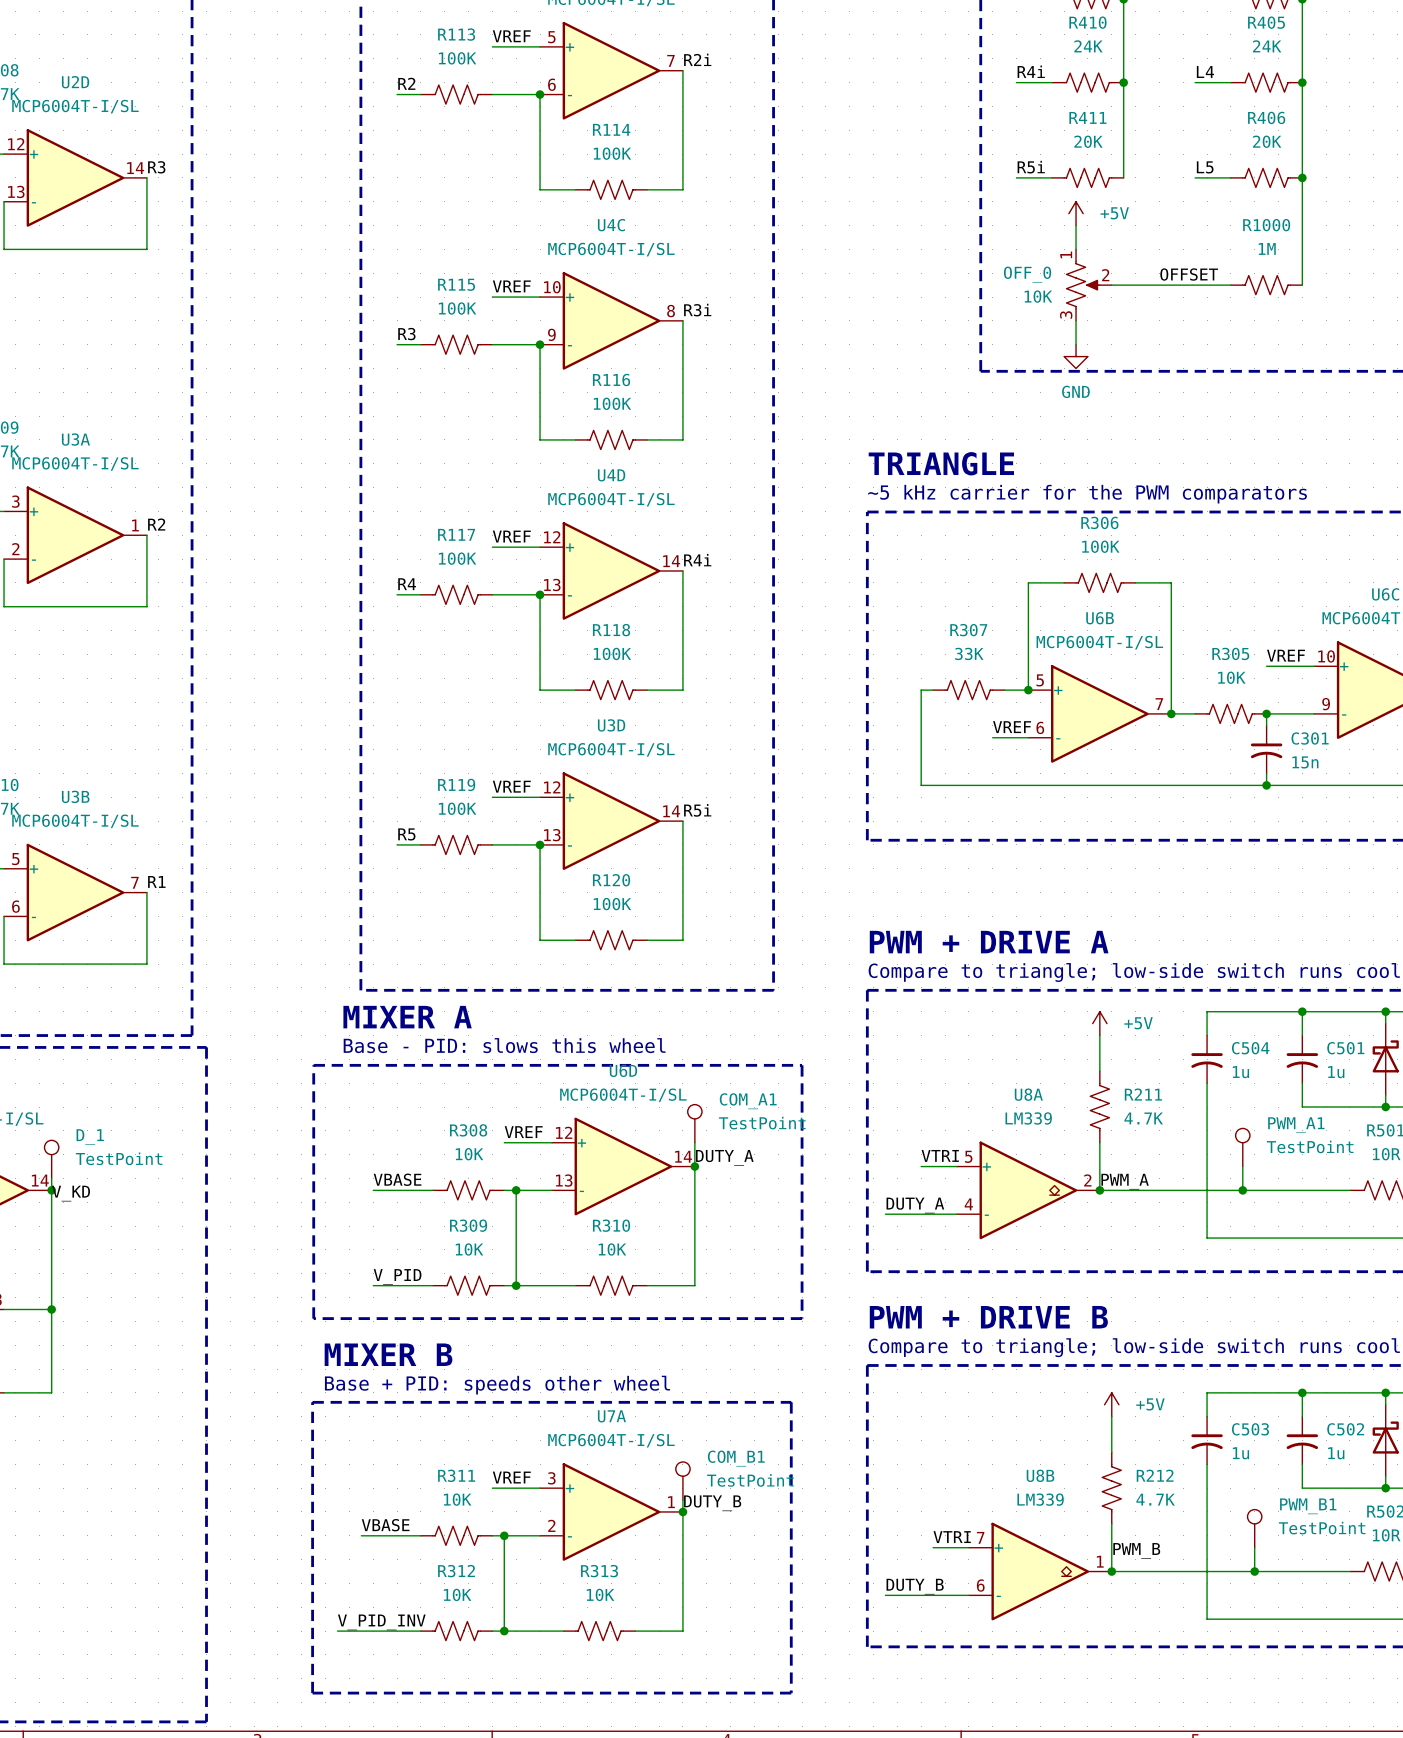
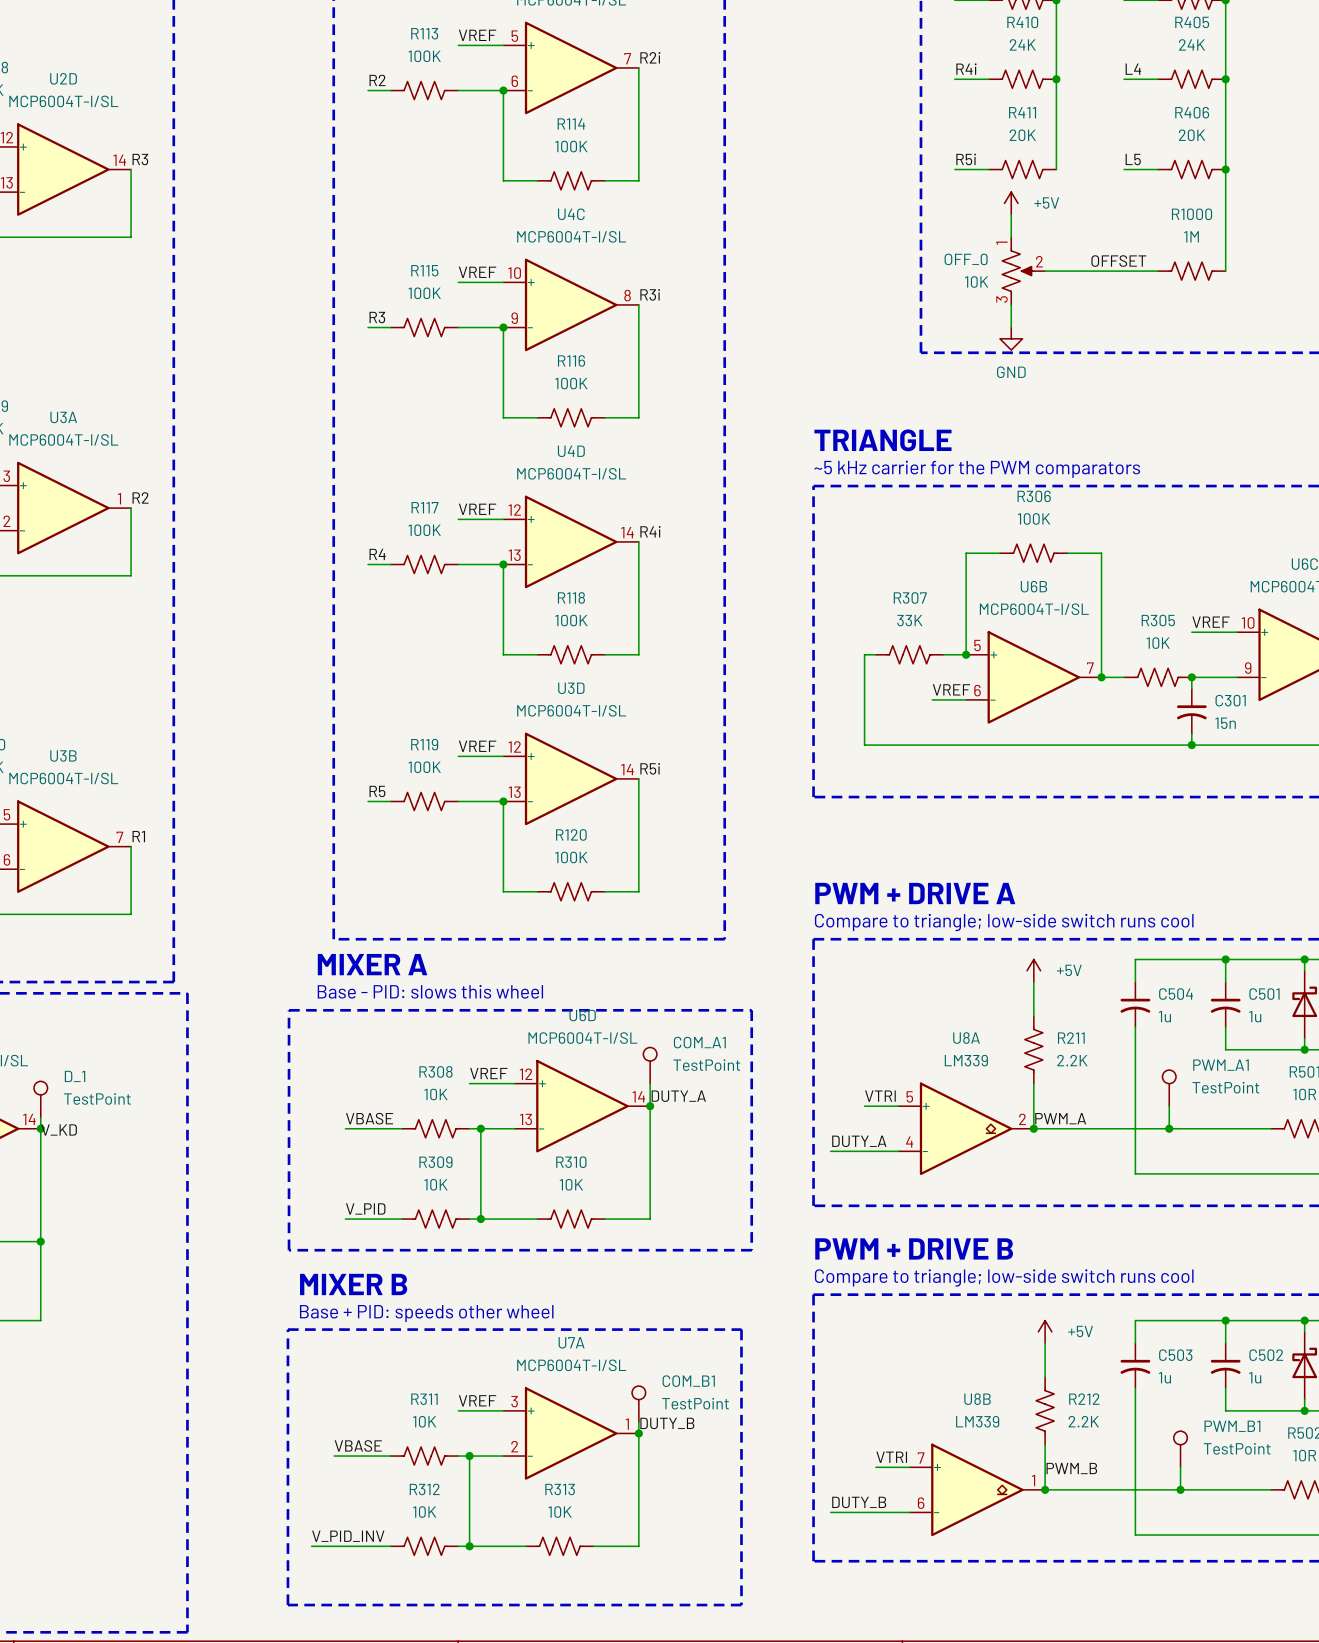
R211 value: 4.7K (1143, 1118) -> 2.2K (1072, 1060)
R212 value: 4.7K (1155, 1499) -> 2.2K (1083, 1421)

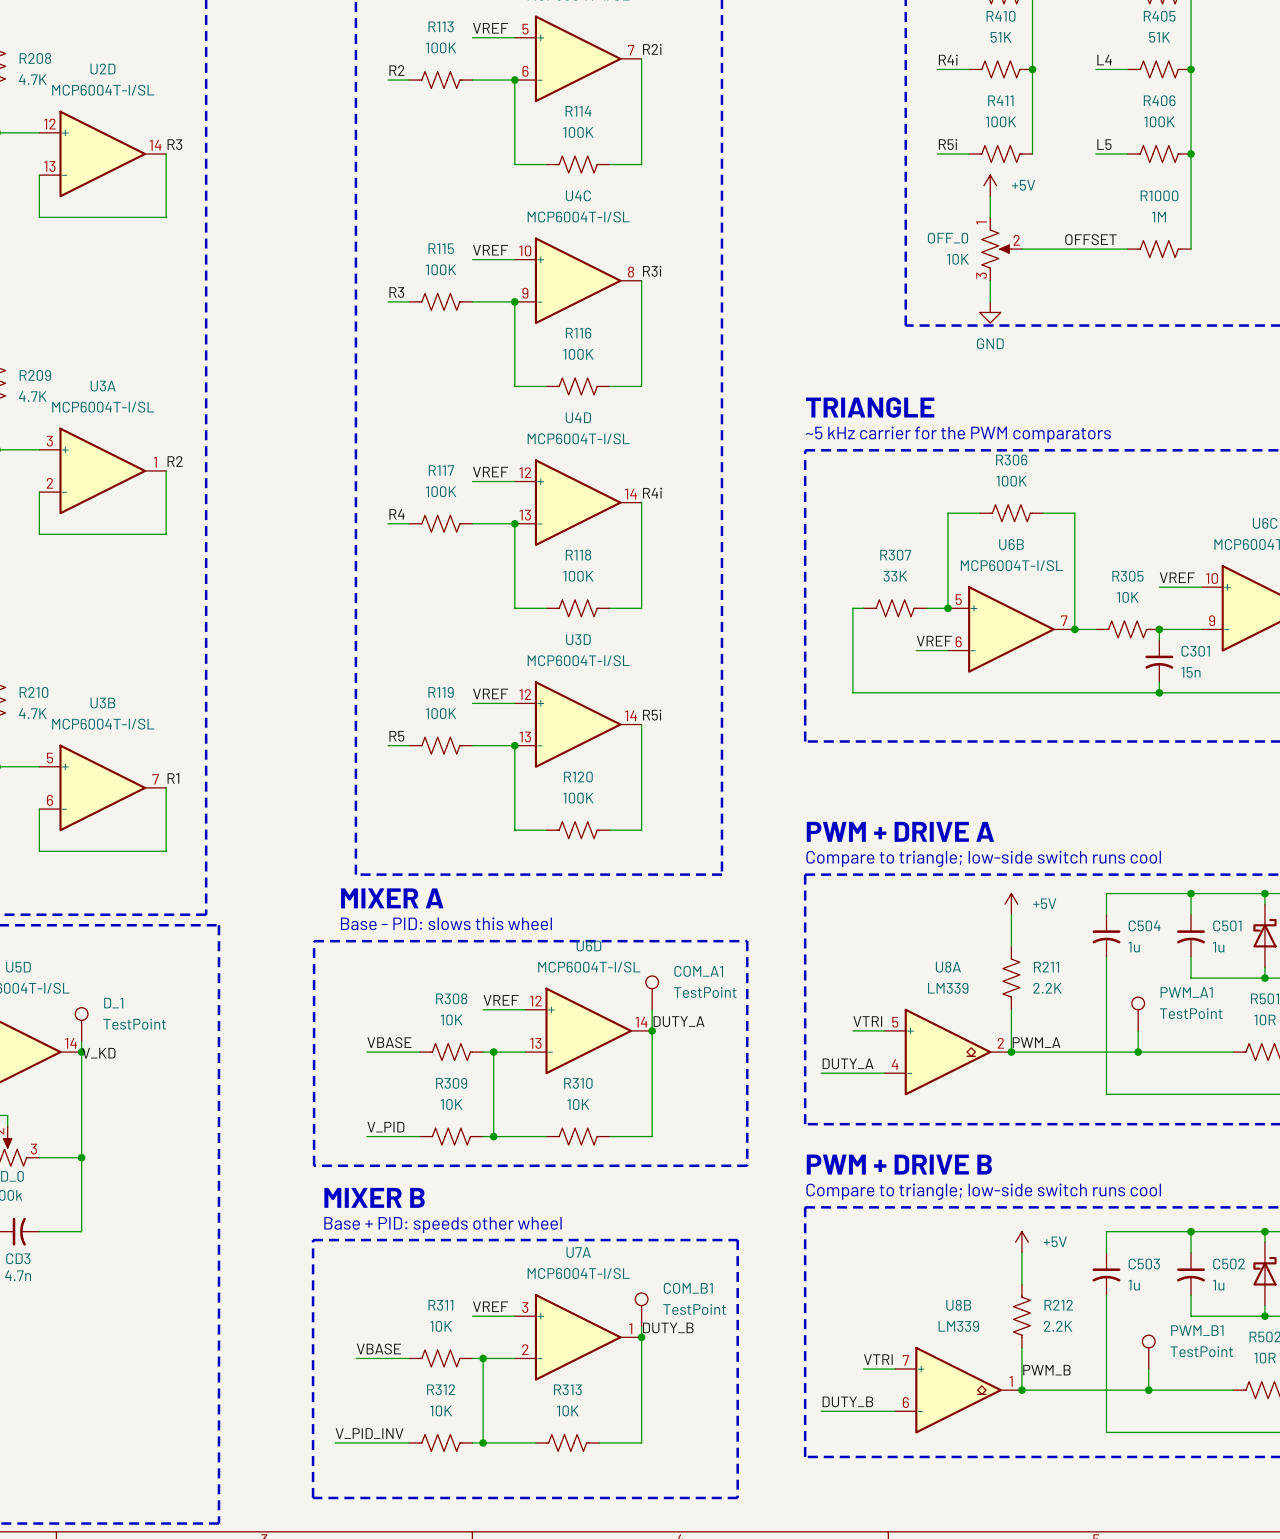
R410 value: 24K (1022, 44) -> 51K (1001, 37)
R405 value: 24K (1192, 44) -> 51K (1159, 37)
R411 value: 20K (1022, 135) -> 100K (1001, 121)
R406 value: 20K (1192, 135) -> 100K (1159, 121)

